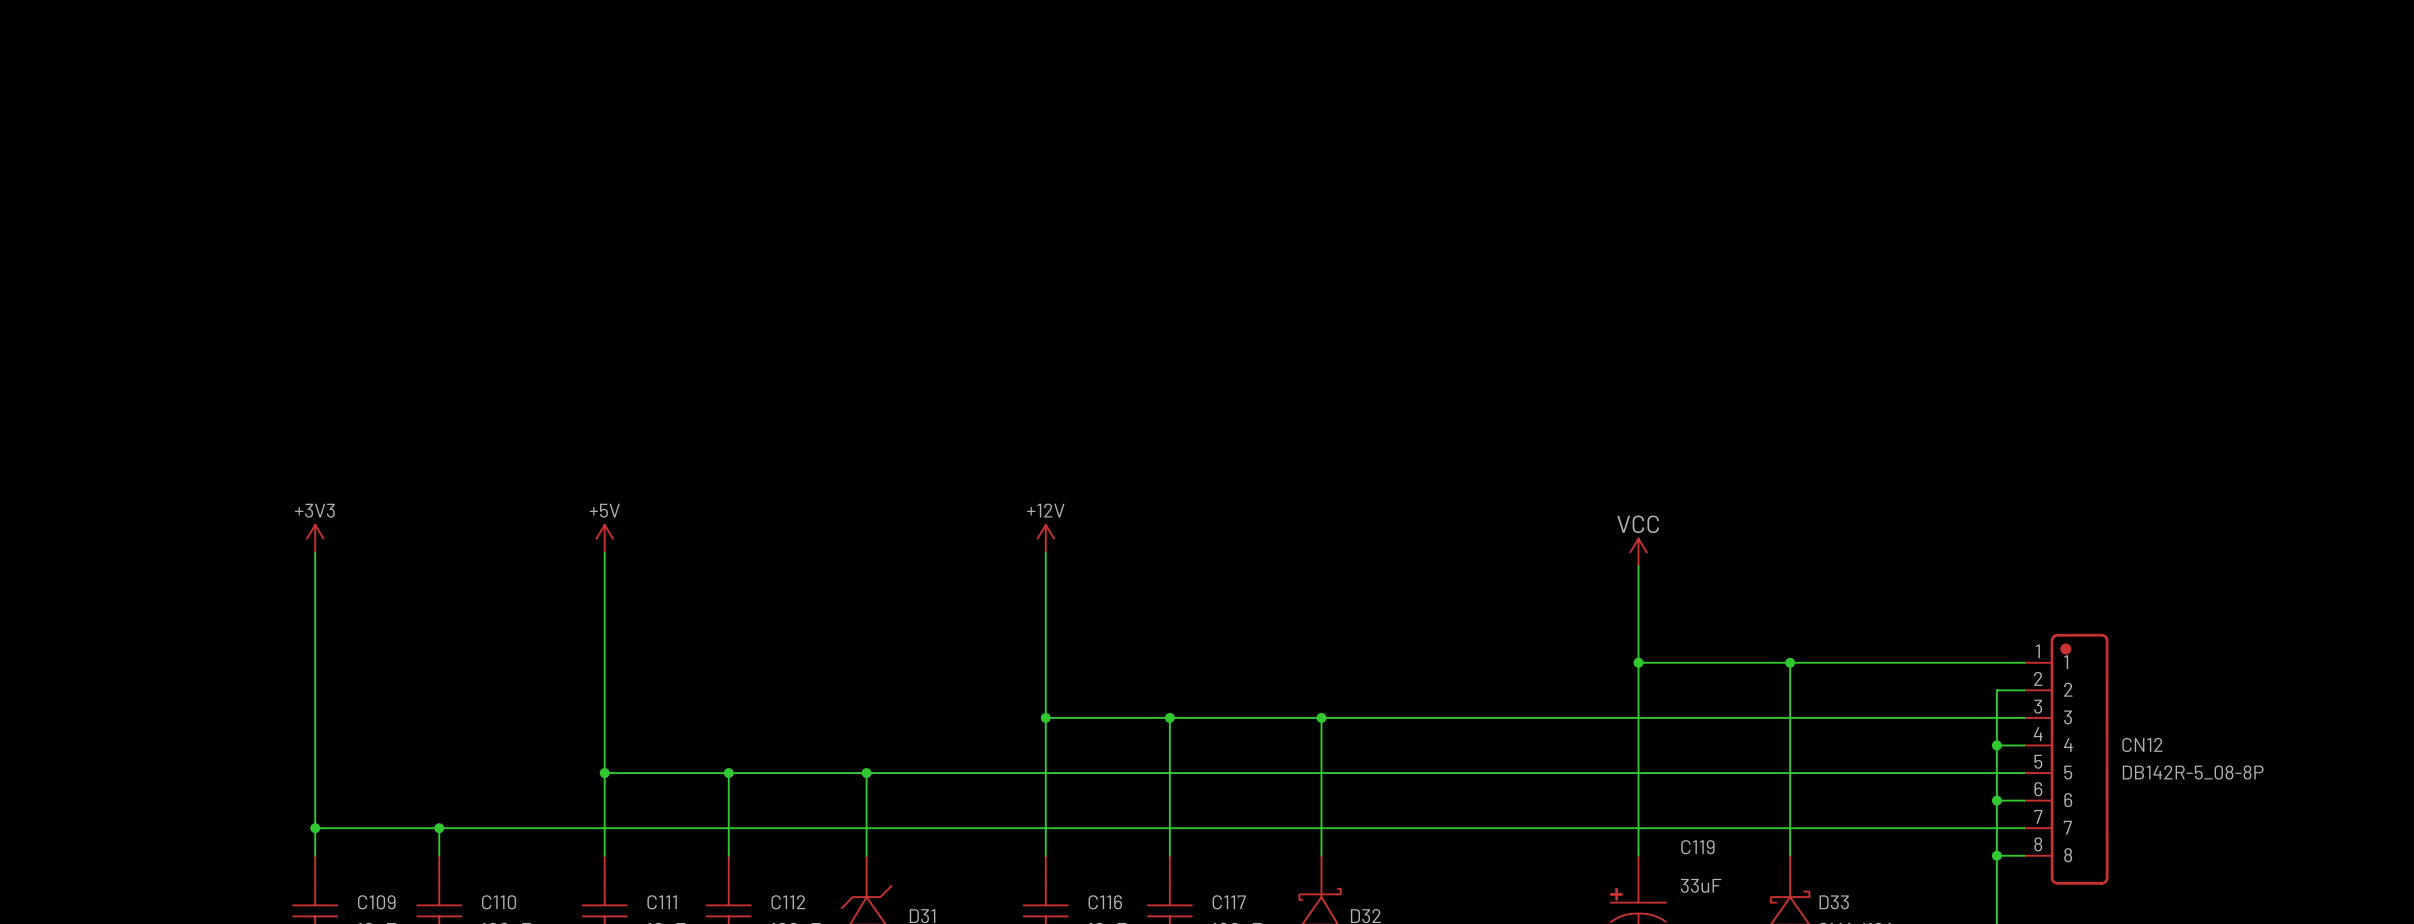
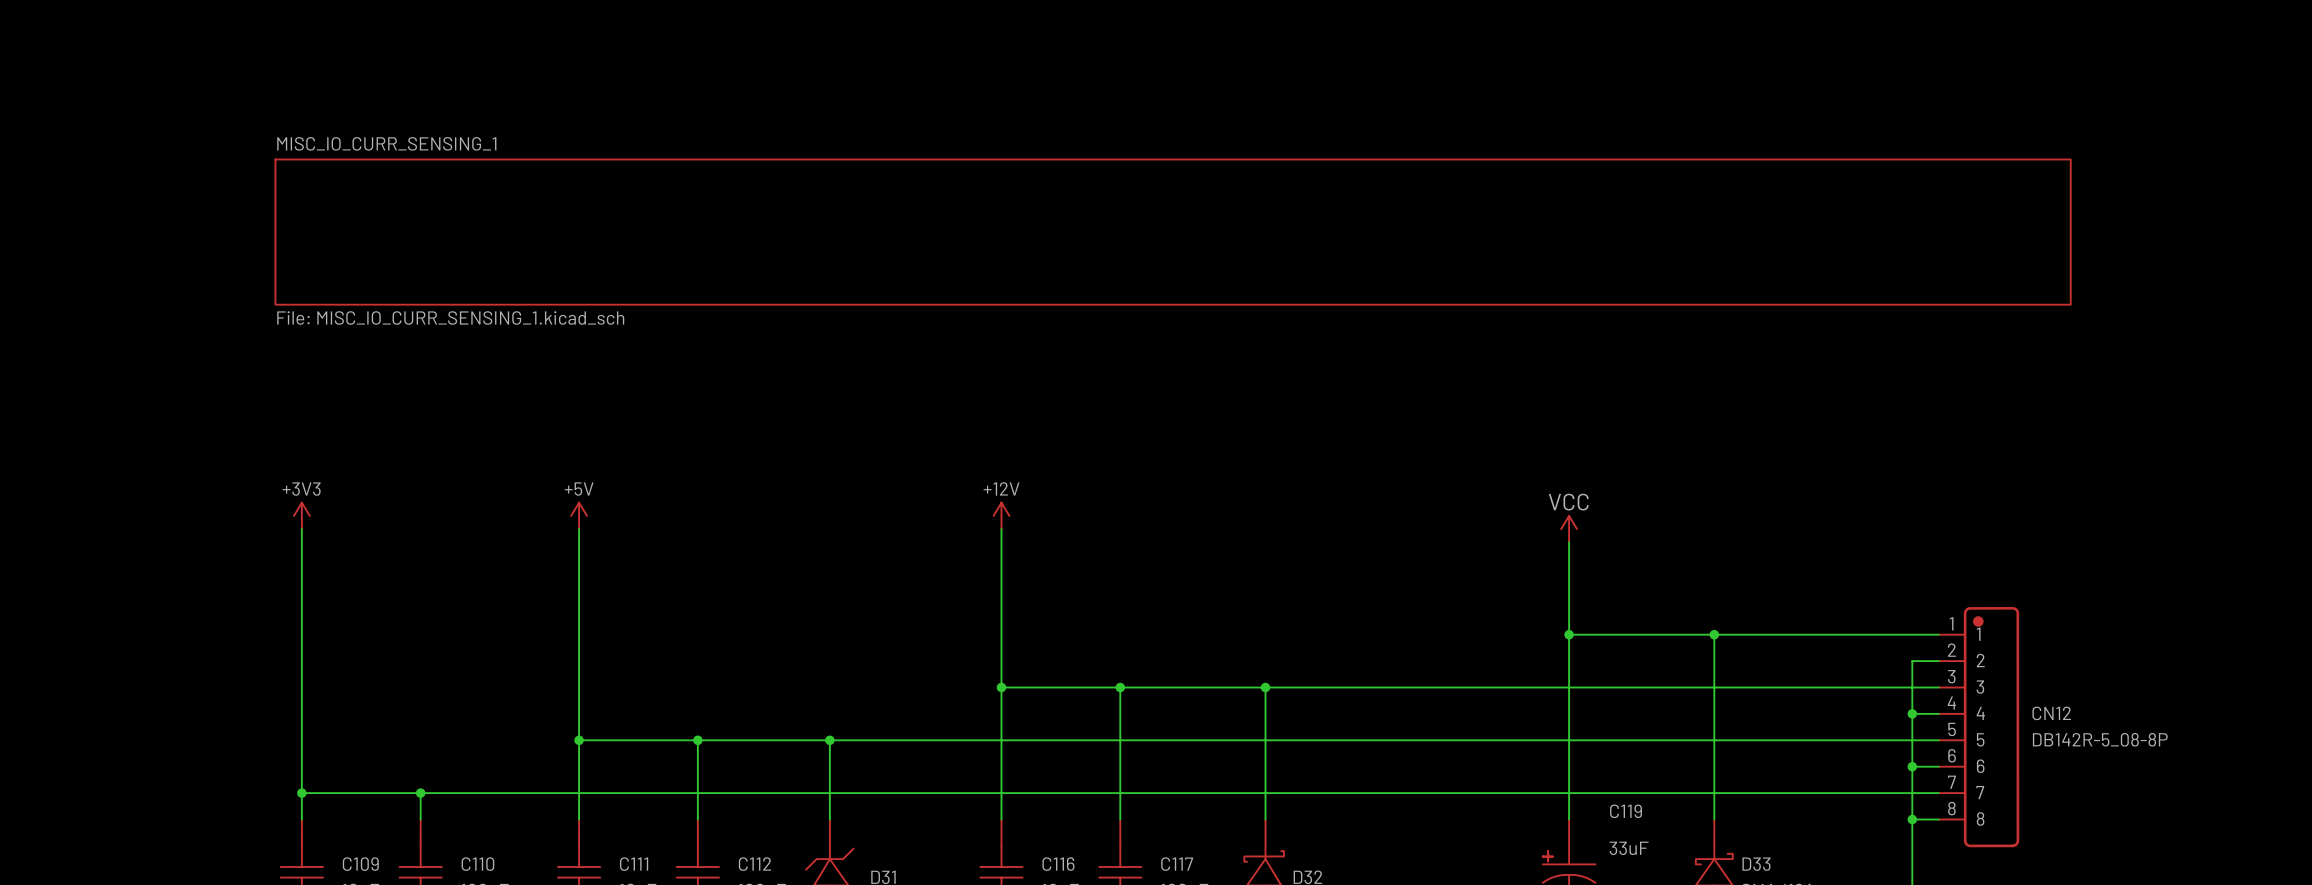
sheet MISC_IO_CURR_SENSING_1: none -> File: MISC_IO_CURR_SENSING_1.kicad_sch (1173, 232)

